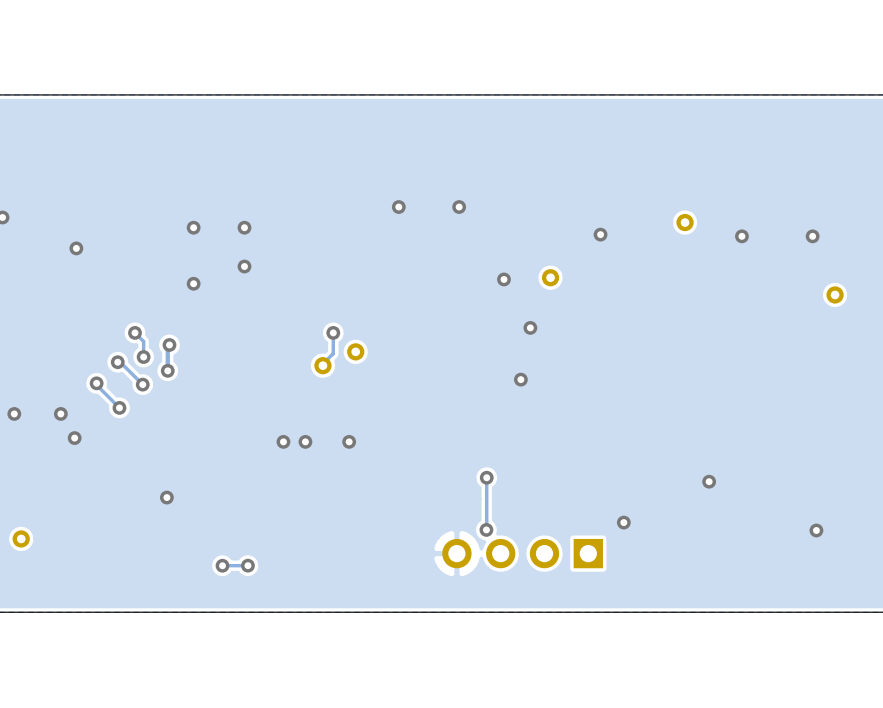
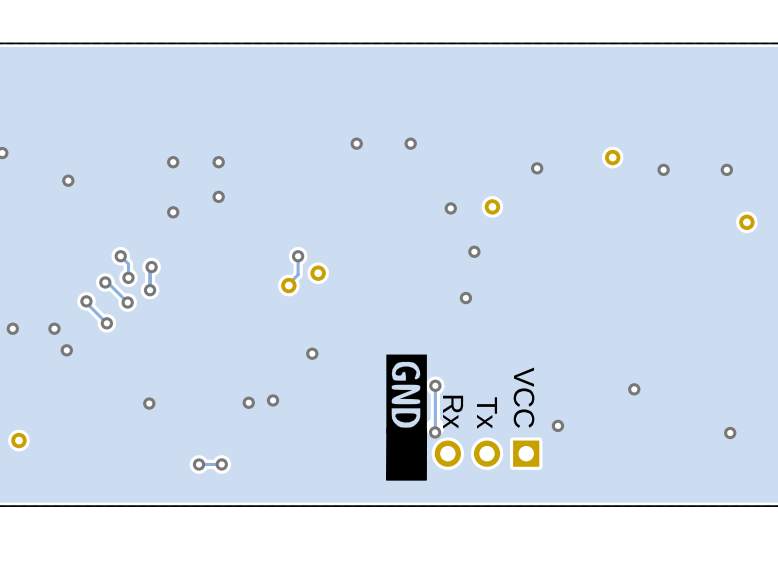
via: (283, 441) -> none
via: (305, 441) -> none
drawing: none -> [386, 354, 428, 481]
text: none -> VCC (524, 397)
via: none -> (273, 400)
via: none -> (248, 402)
text: none -> Rx (453, 412)
text: none -> Tx (487, 412)

